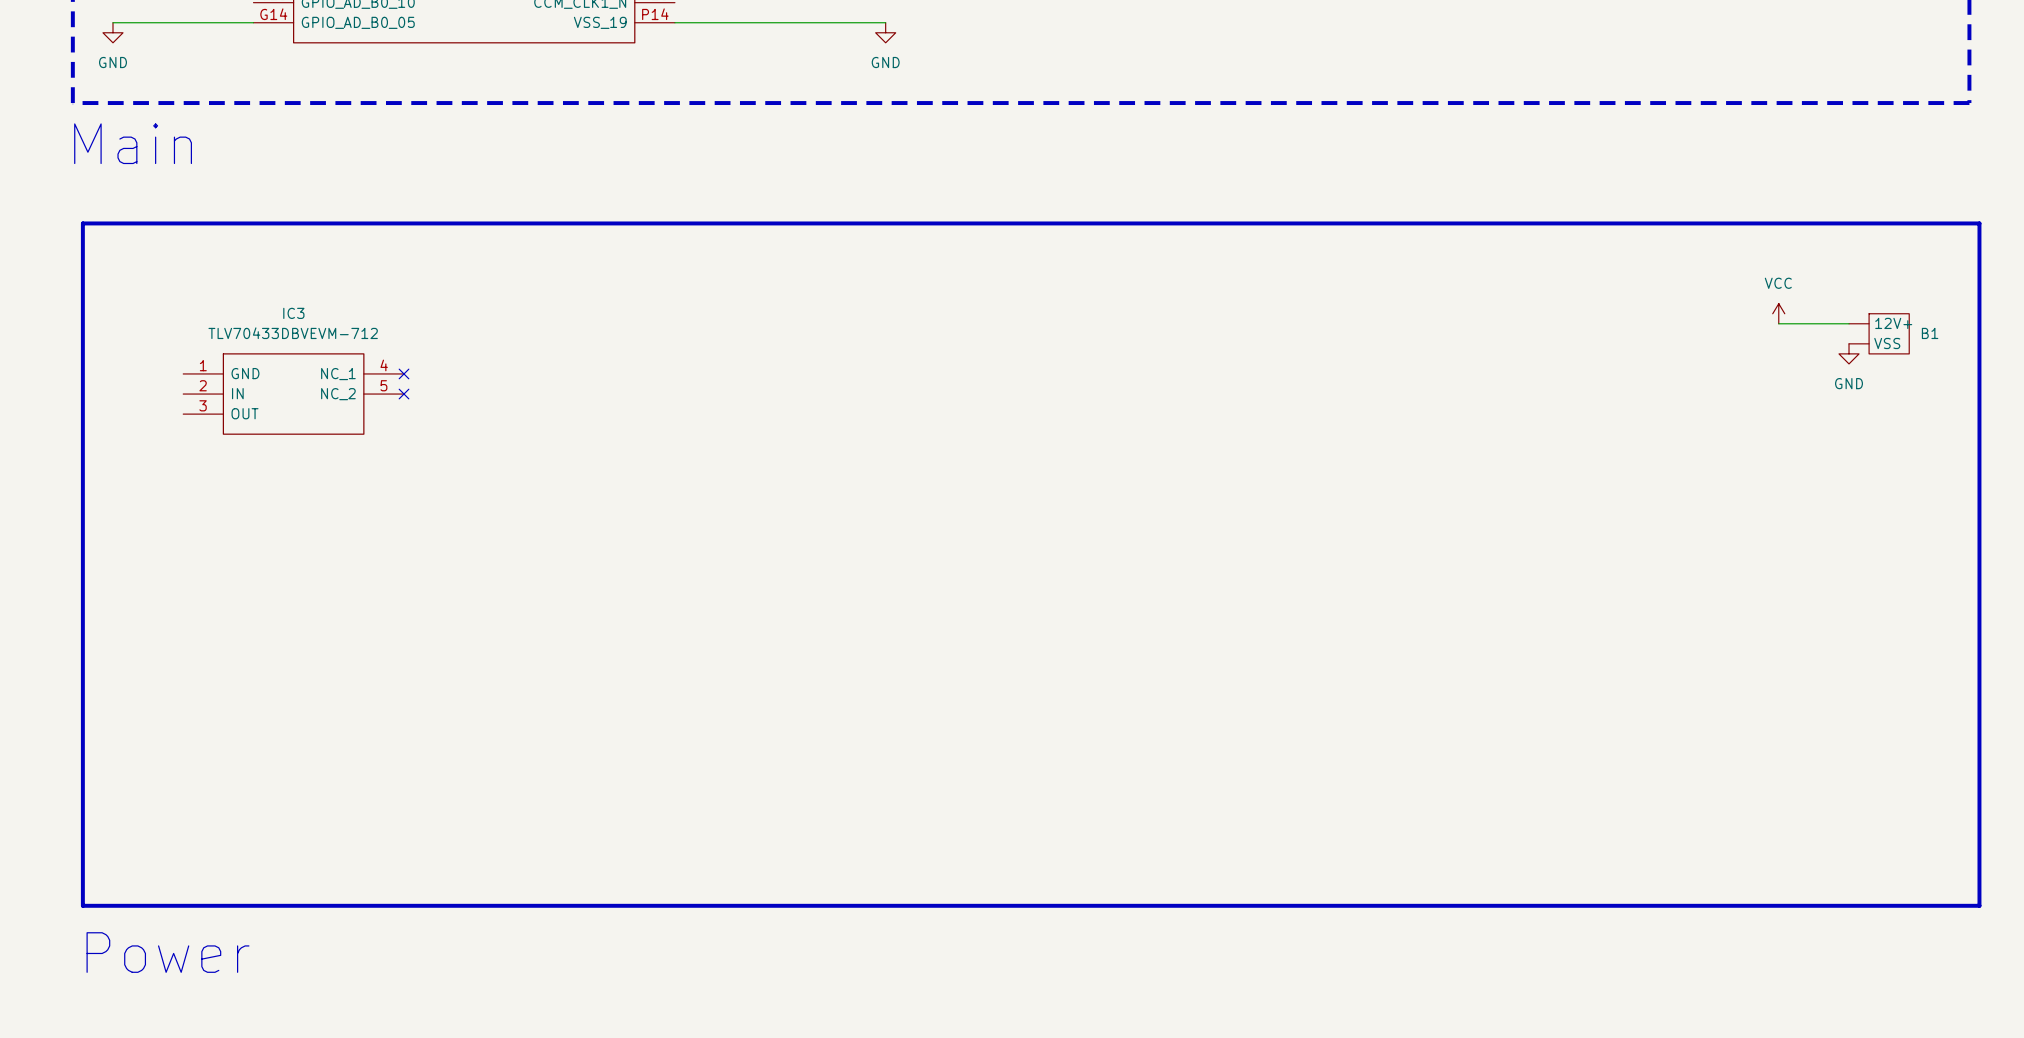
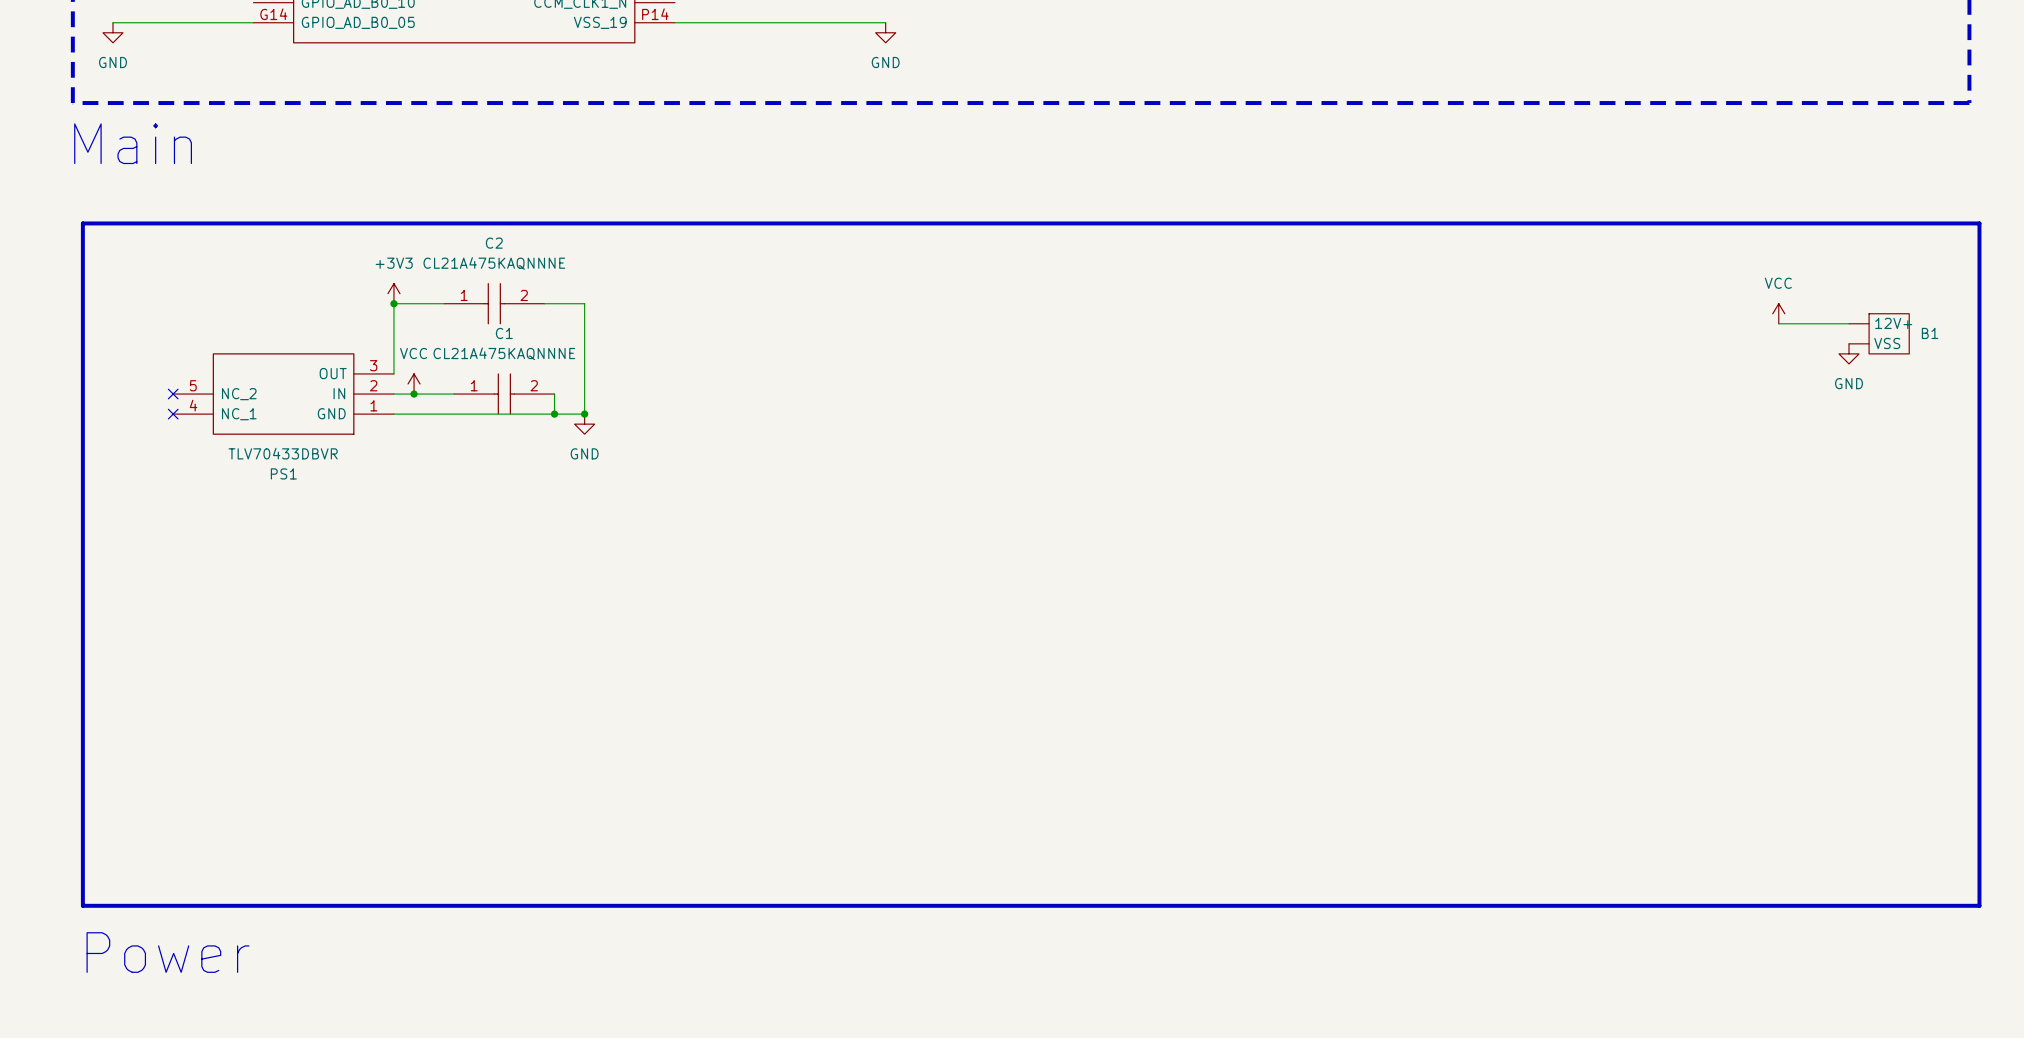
power symbol: none -> +3V3 (393, 293)
junction: none -> (393, 303)
wire: none -> (444, 303) (393, 303) (393, 373)
C2: none -> CL21A475KAQNNNE (494, 303)
wire: none -> (544, 303) (584, 303) (584, 414) (393, 414)
no-connect mark: (404, 373) -> none
power symbol: none -> VCC (414, 384)
no-connect mark: none -> (173, 394)
PS1: none -> TLV70433DBVR (283, 394)
IC3: TLV70433DBVEVM-712 (293, 394) -> none
wire: none -> (393, 394) (454, 394)
no-connect mark: (404, 394) -> none
junction: none -> (414, 394)
C1: none -> CL21A475KAQNNNE (504, 394)
wire: none -> (554, 394) (554, 414)
no-connect mark: none -> (173, 414)
junction: none -> (554, 414)
junction: none -> (584, 414)
power symbol: none -> GND (584, 424)

